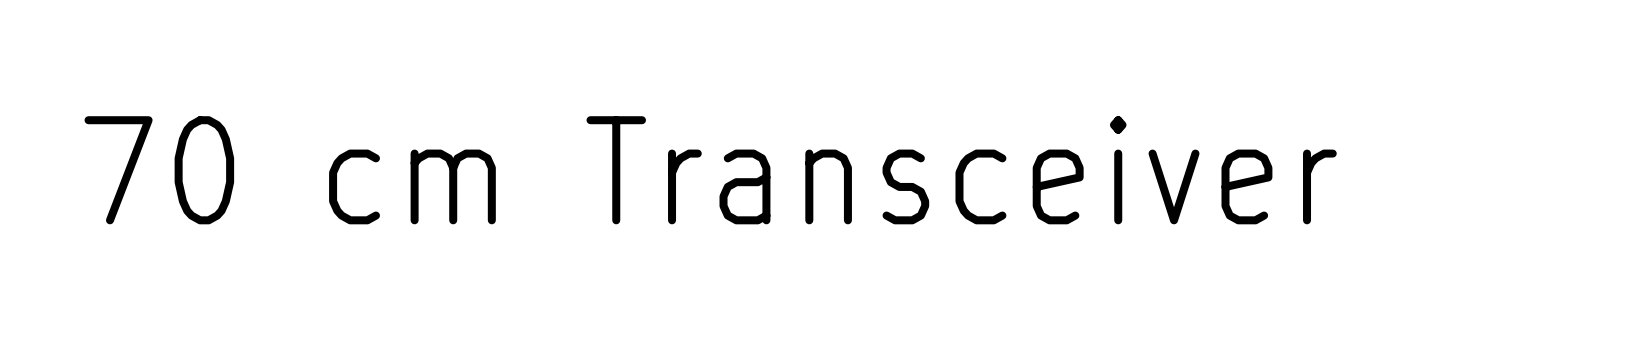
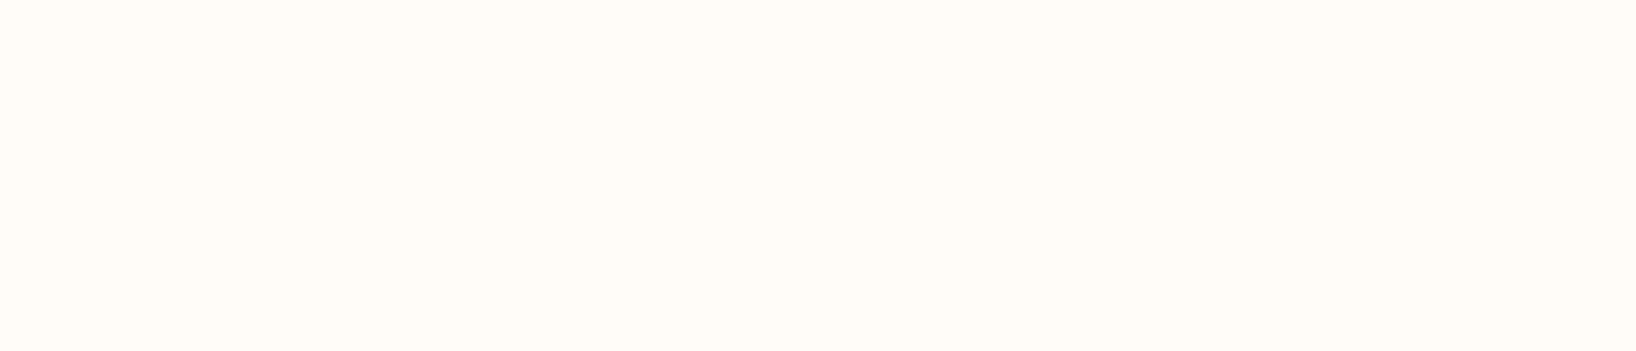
text: 70 cm Transceiver (710, 170) -> none

